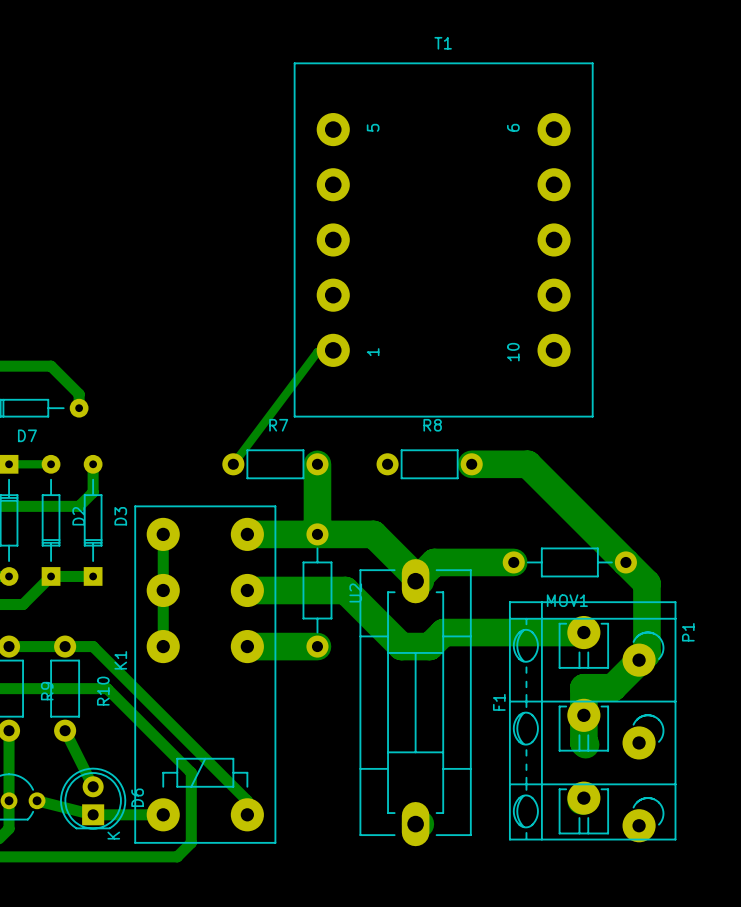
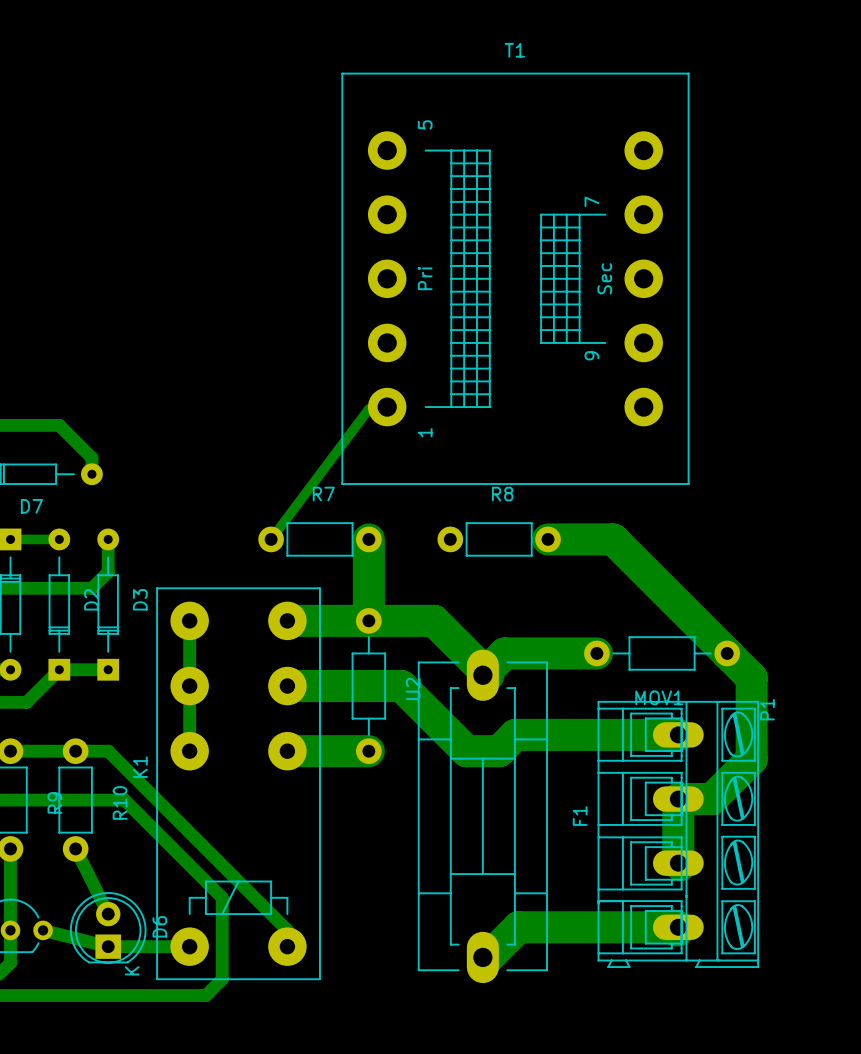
T1 footprint: [293, 62, 594, 418] -> [341, 72, 690, 485]
P1 footprint: [509, 601, 677, 843] -> [597, 700, 760, 968]
P1 name position: P1 (688, 632) -> P1 (767, 709)
bottom track: none -> (678, 927) (518, 927) (488, 957)

